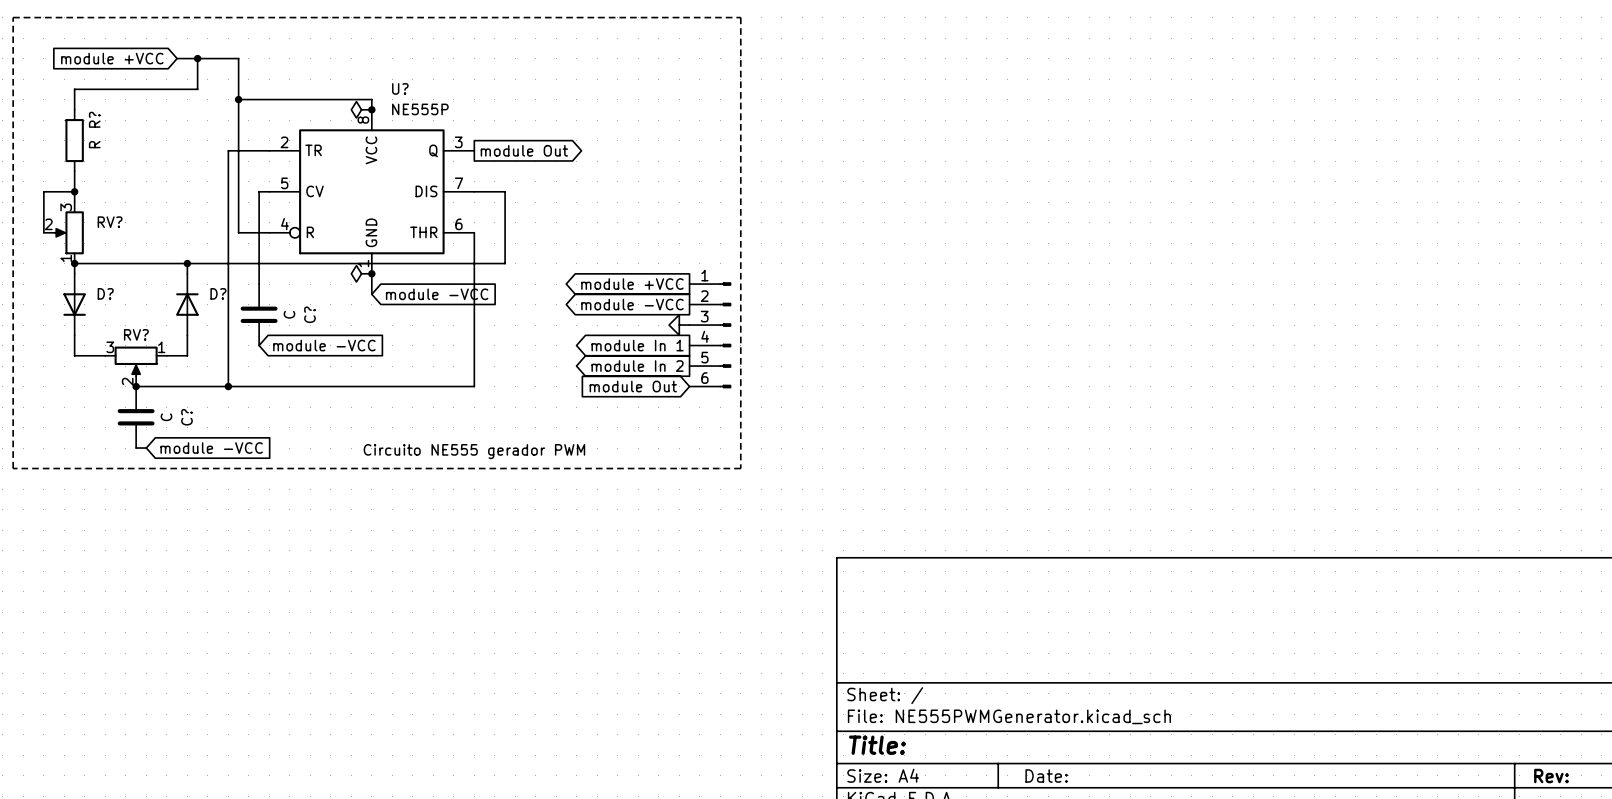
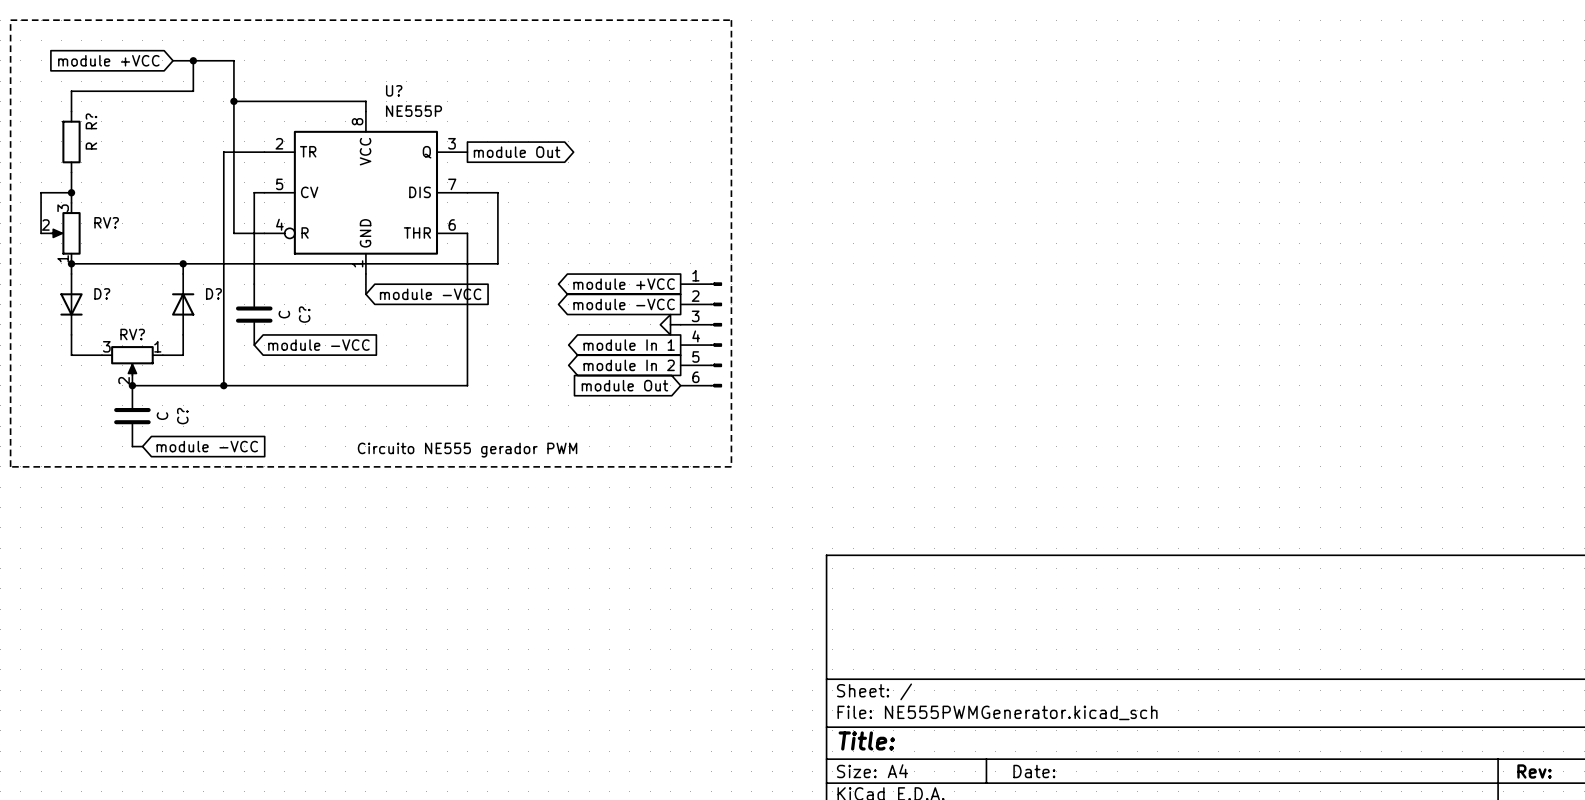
power symbol: (361, 109) -> none
junction: (371, 109) -> none
power symbol: (361, 273) -> none
junction: (371, 273) -> none

